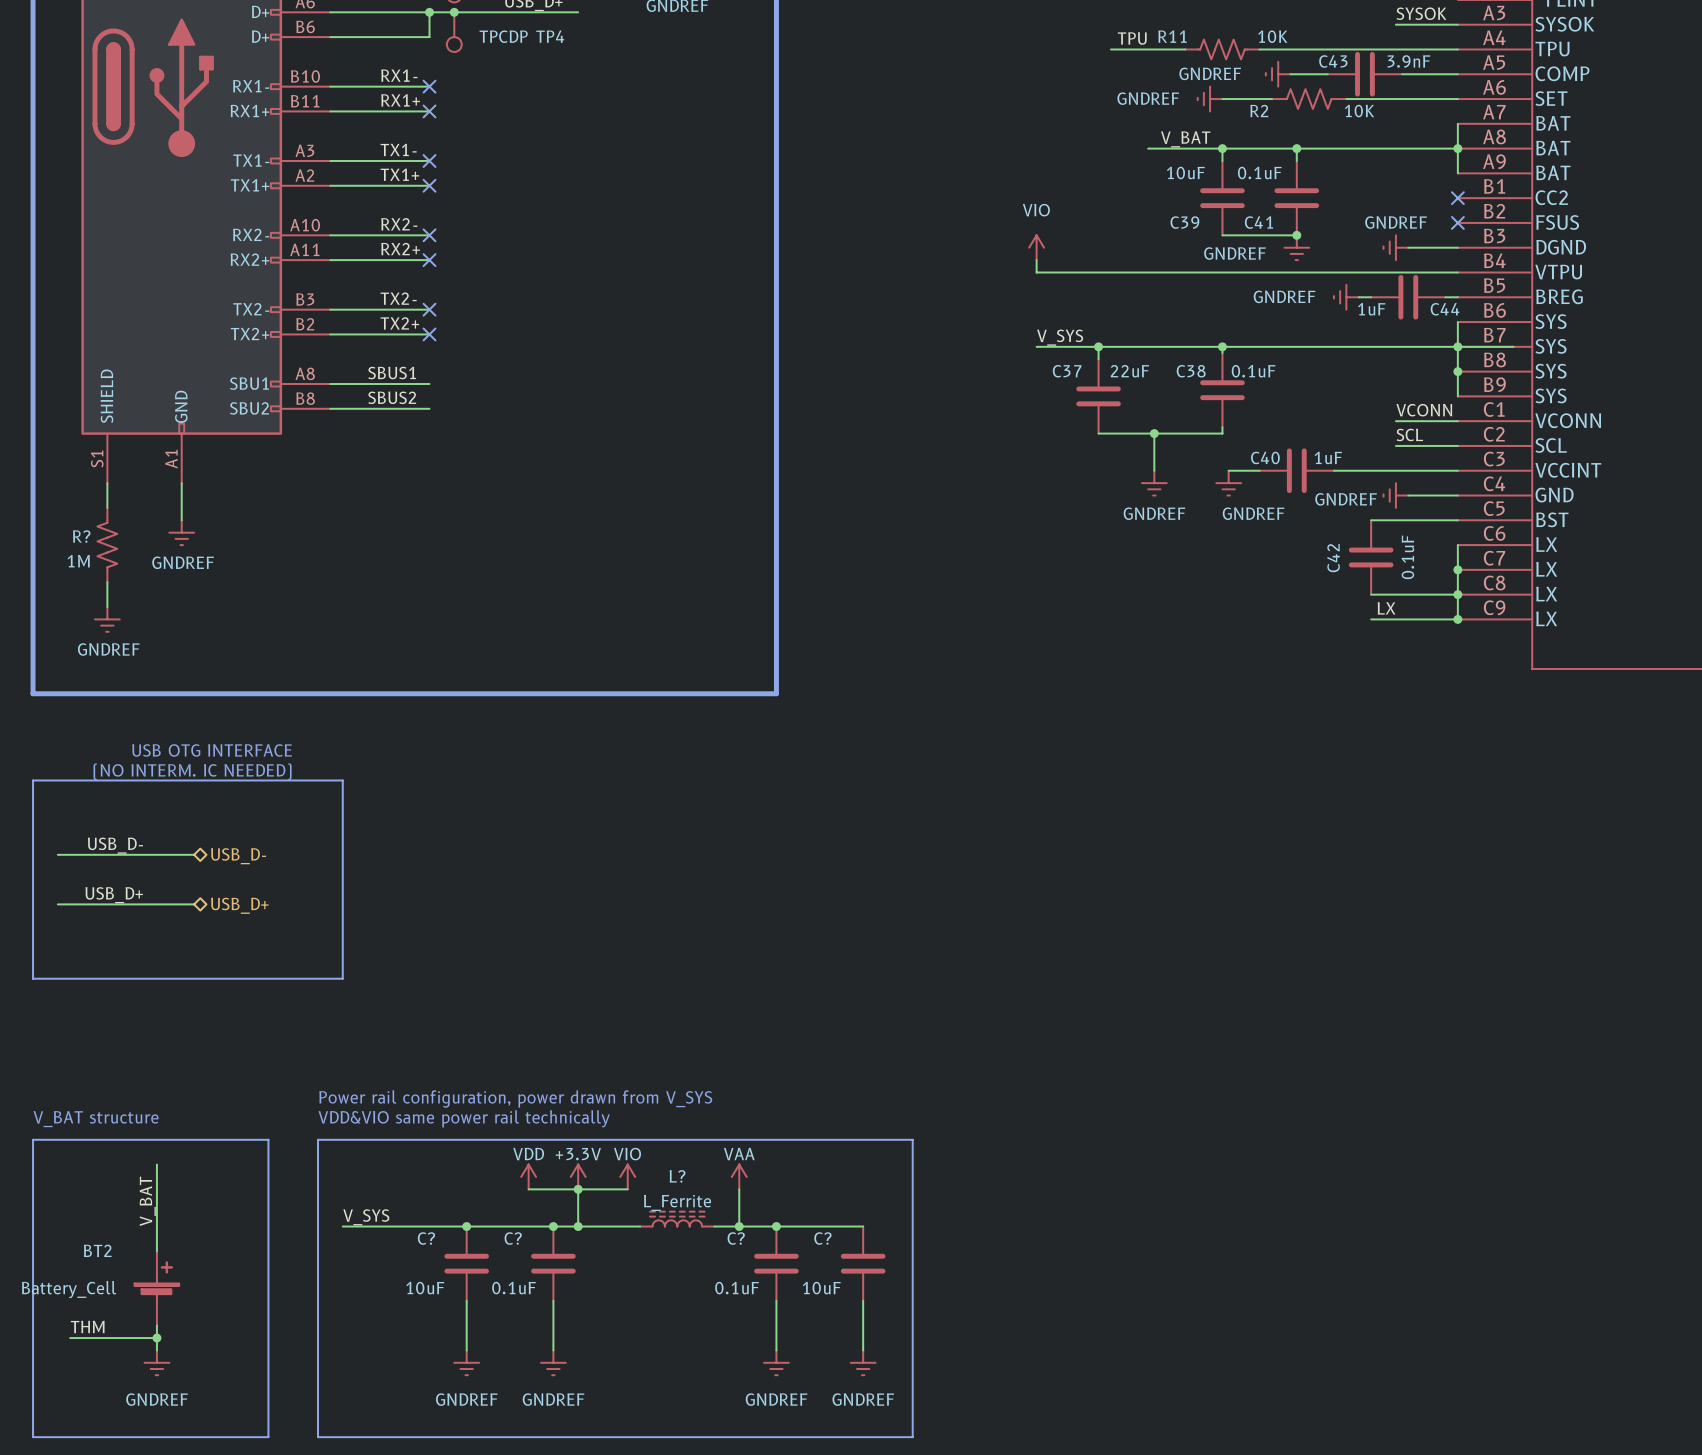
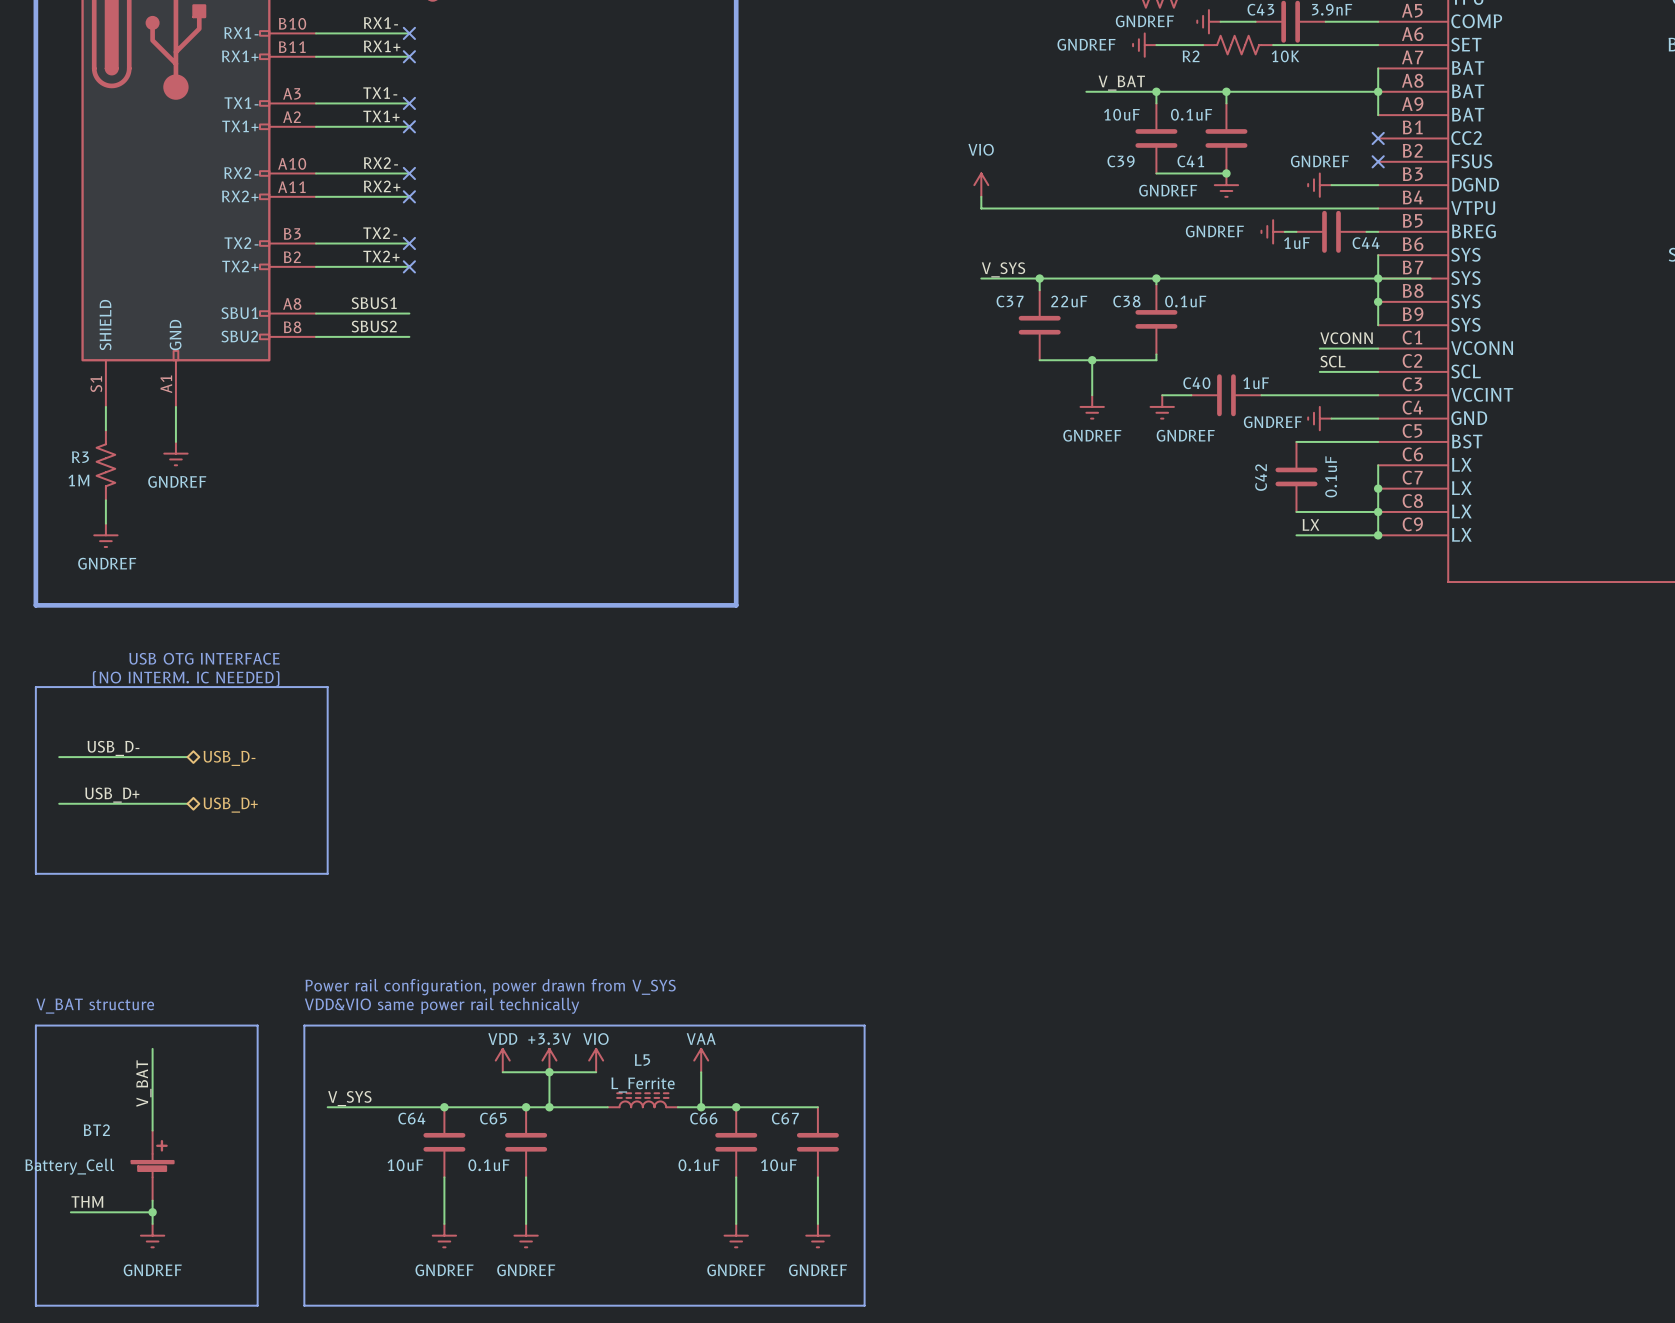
R? name: R? (81, 536) -> R3 (80, 457)
L? name: L? (677, 1176) -> L5 (642, 1059)
C? name: C? (426, 1238) -> C64 (411, 1118)
C? name: C? (513, 1238) -> C65 (493, 1118)
C? name: C? (736, 1238) -> C66 (703, 1118)
C? name: C? (822, 1238) -> C67 (785, 1118)

